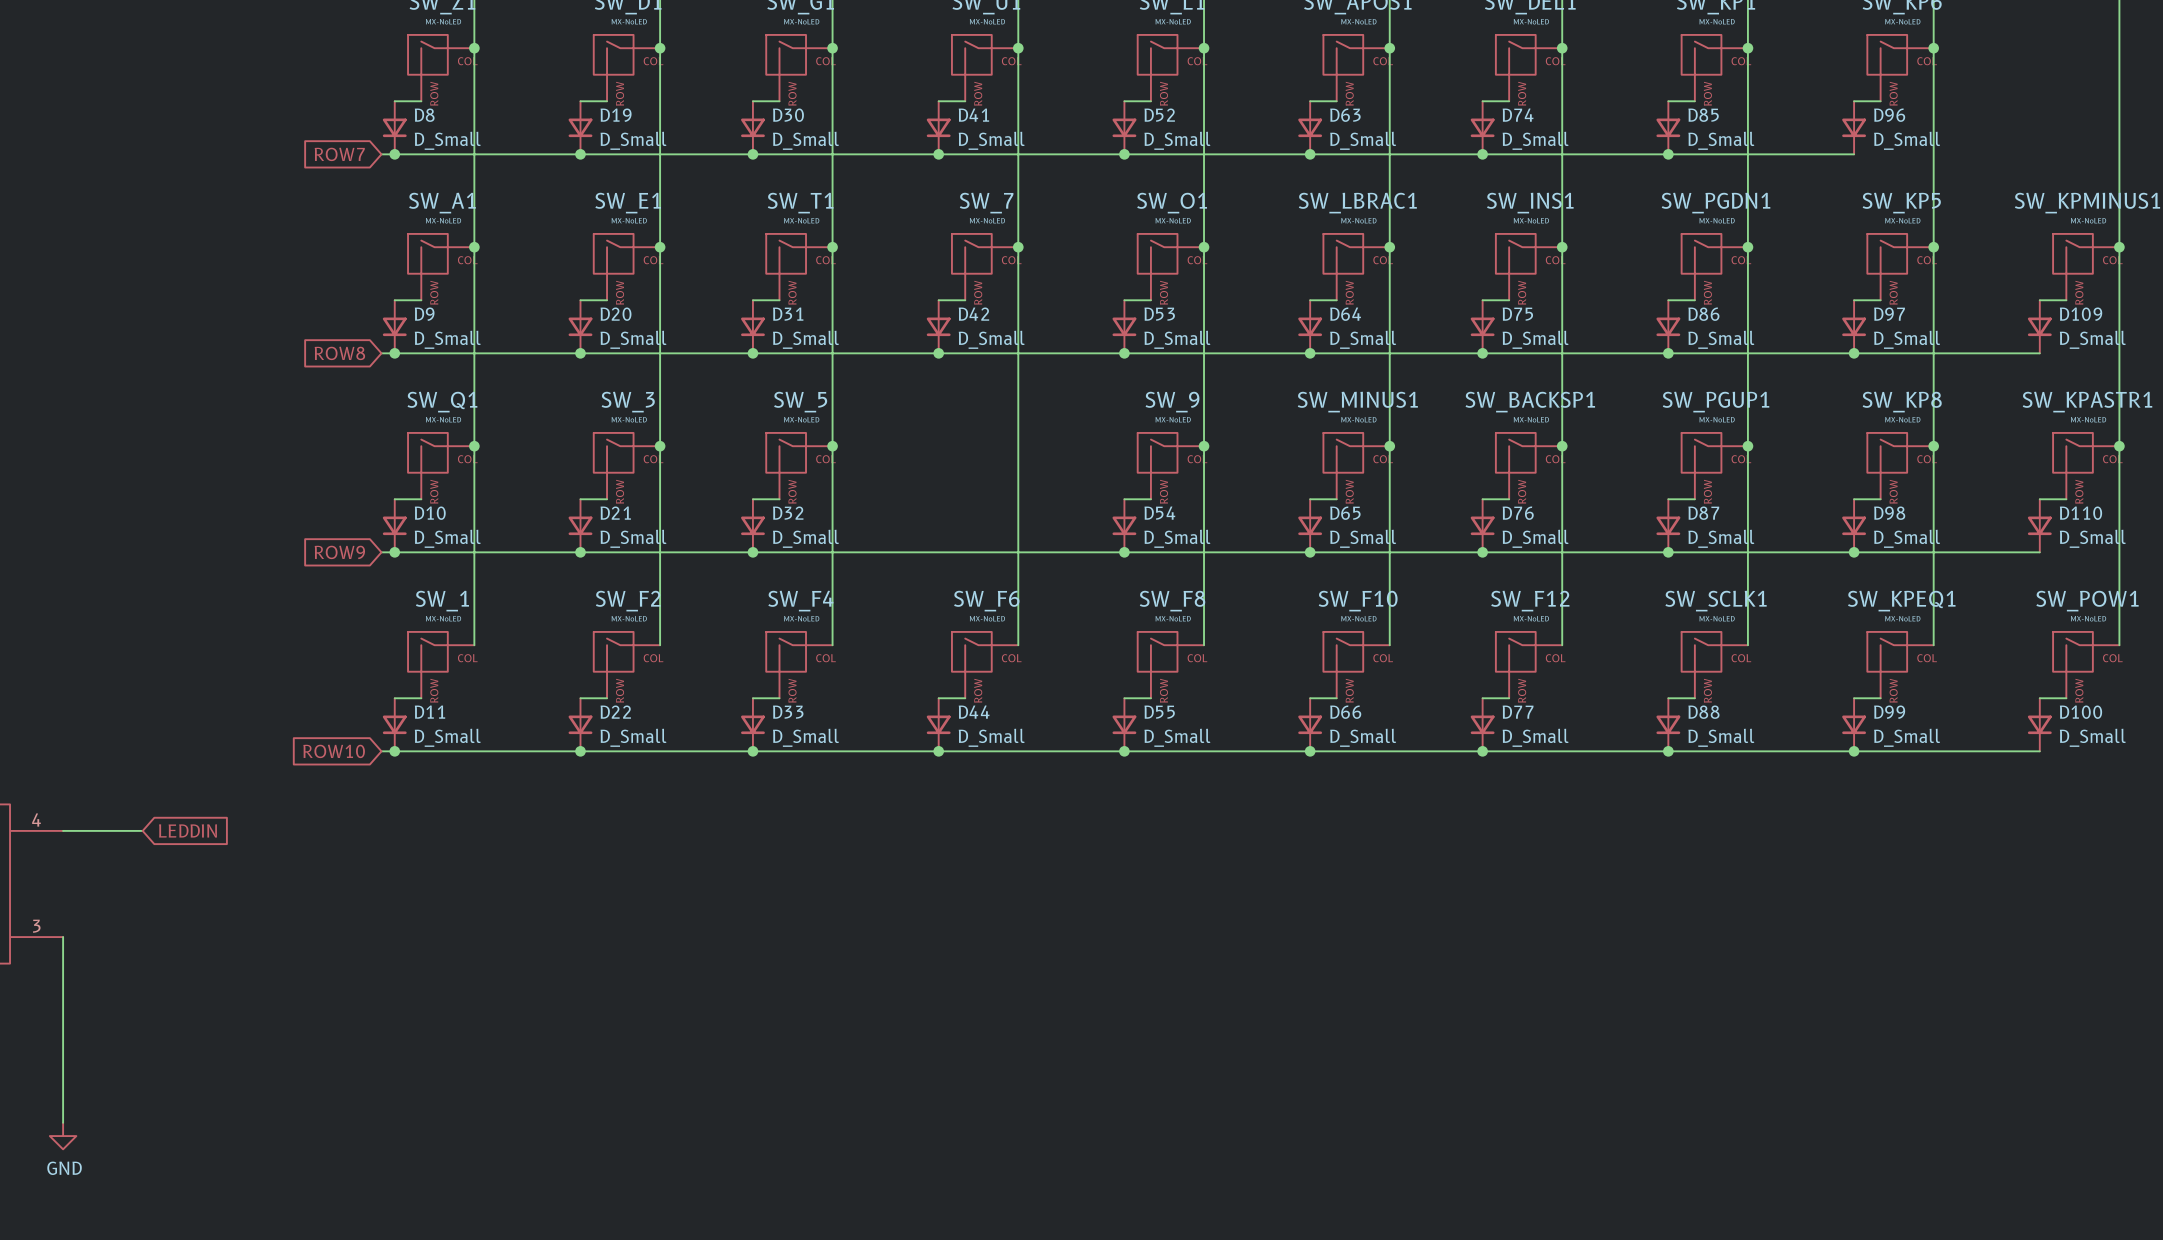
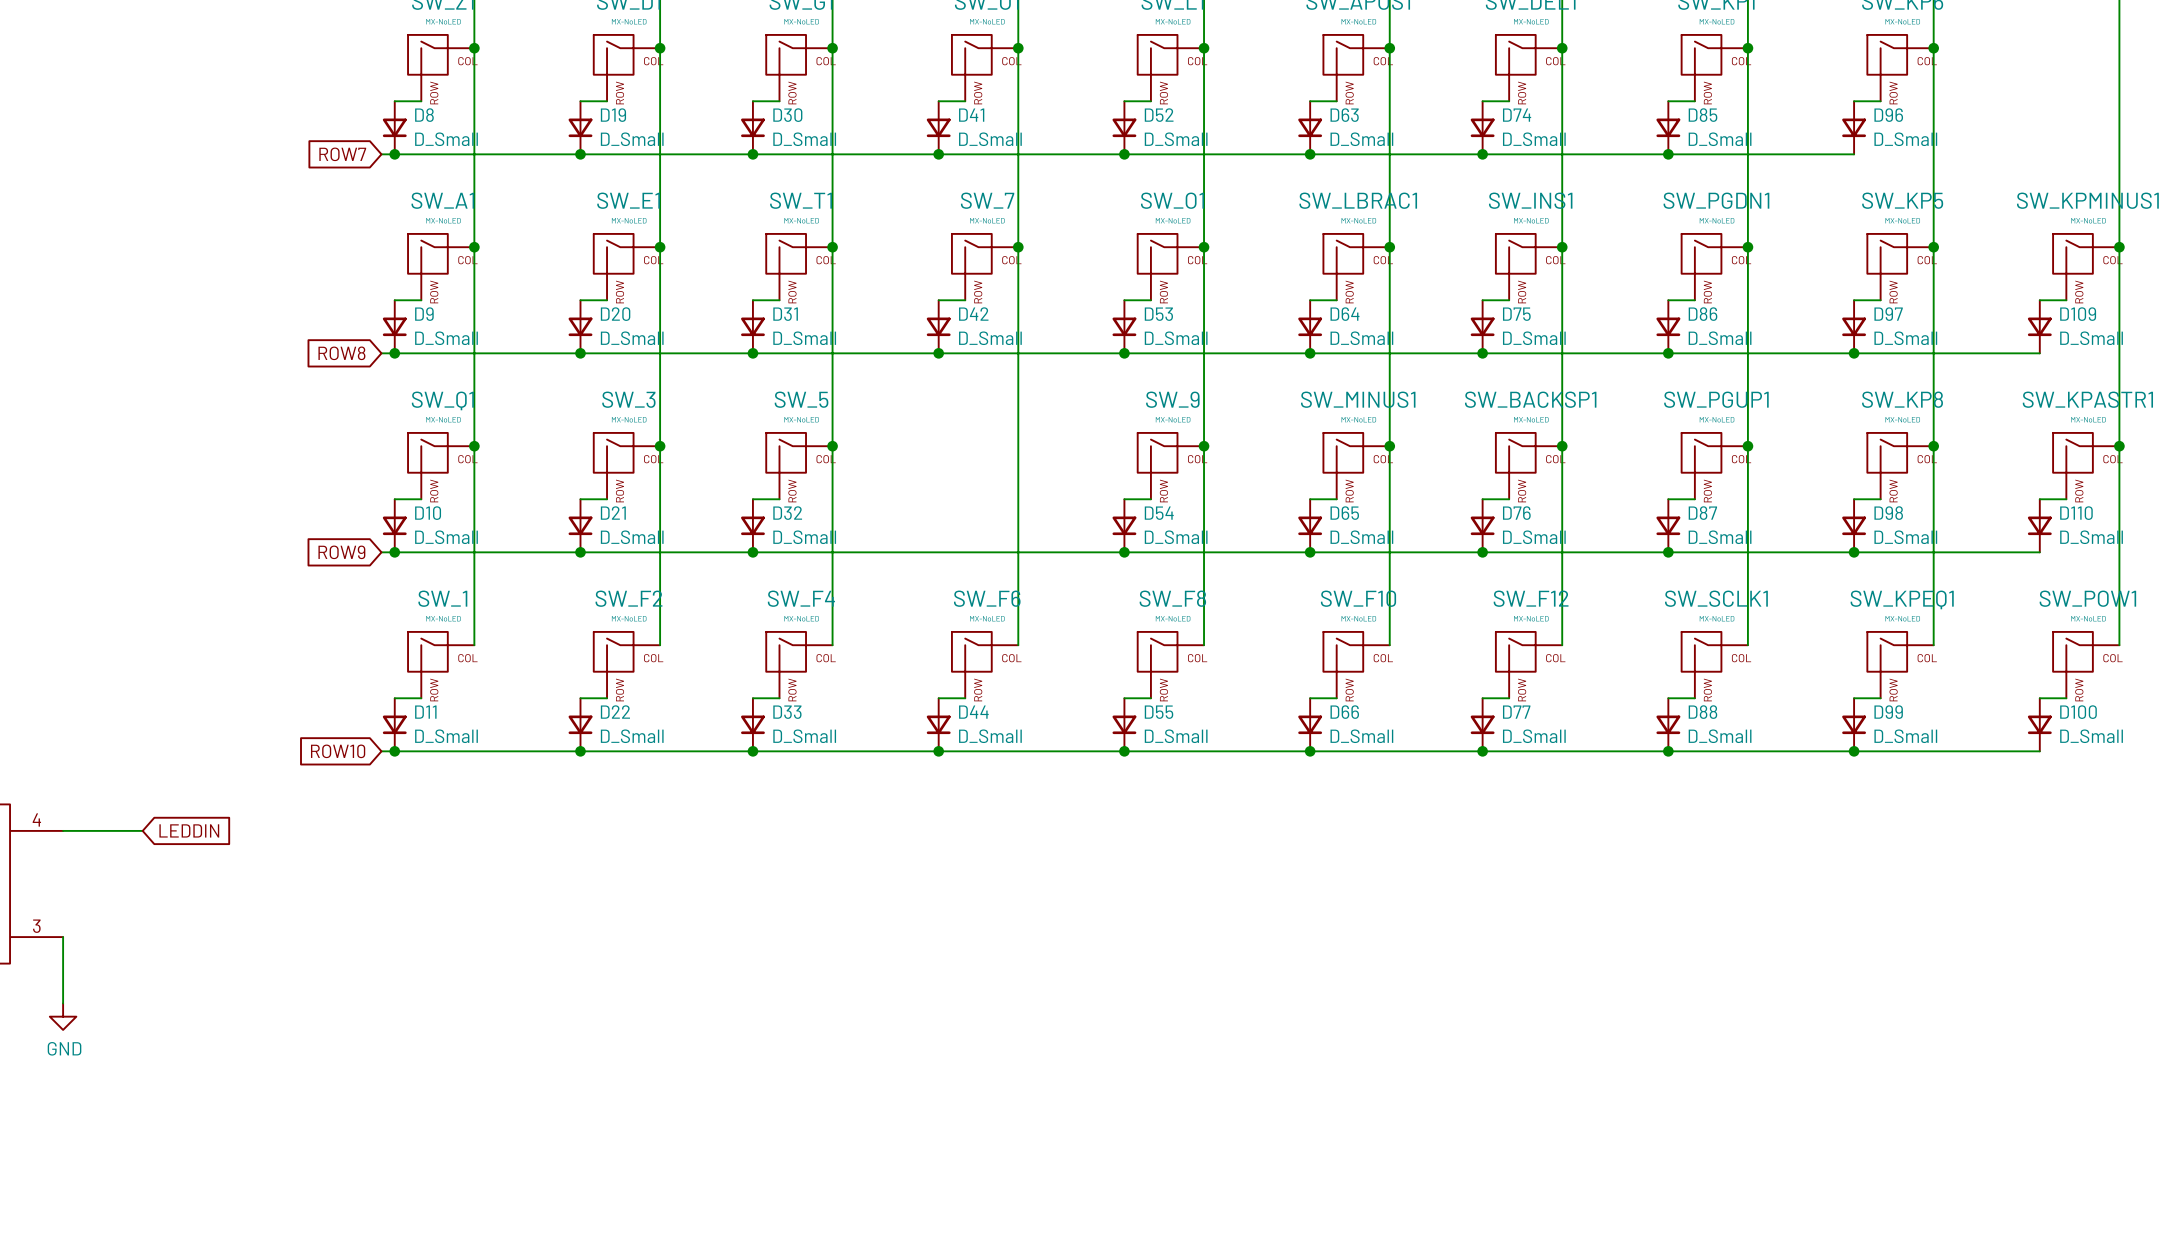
wire: (63, 1003) (63, 1122) -> none
power symbol position: GND (63, 1136) -> GND (63, 1016)

